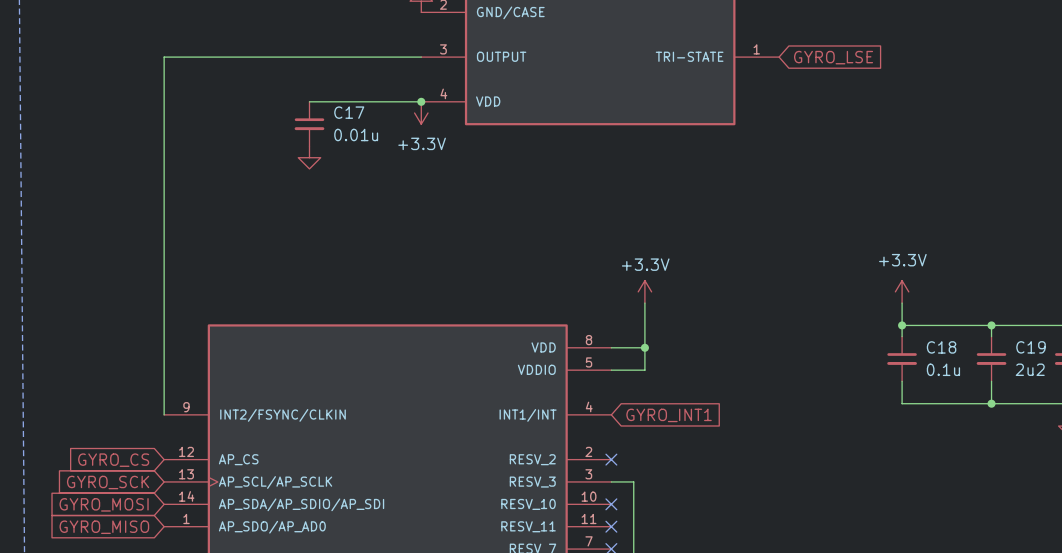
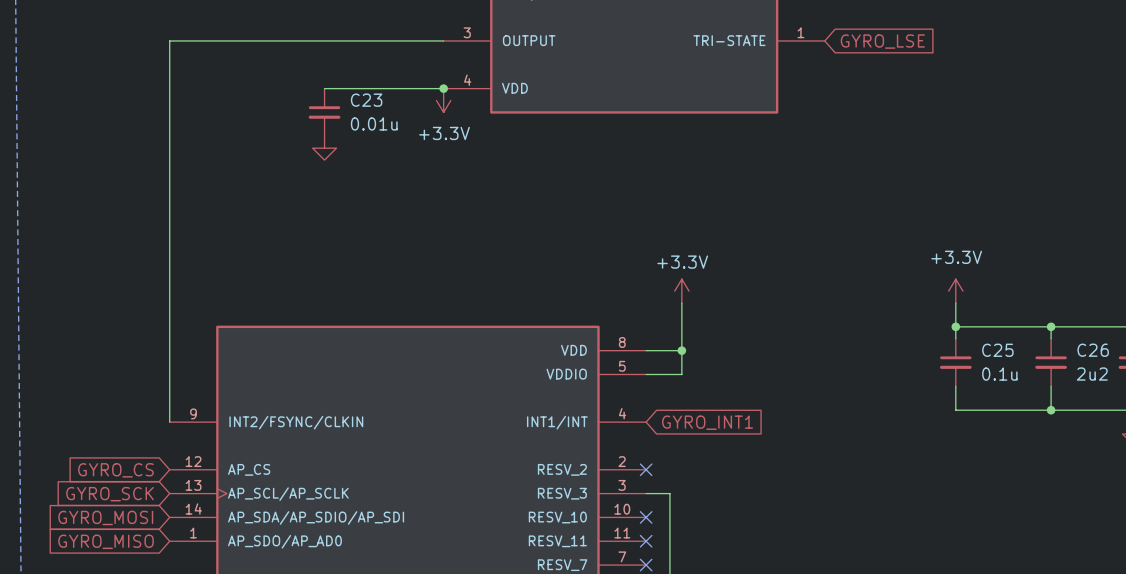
C17 name: C17 (349, 112) -> C23 (366, 100)
C18 name: C18 (941, 347) -> C25 (997, 350)
C19 name: C19 (1031, 347) -> C26 (1093, 350)

